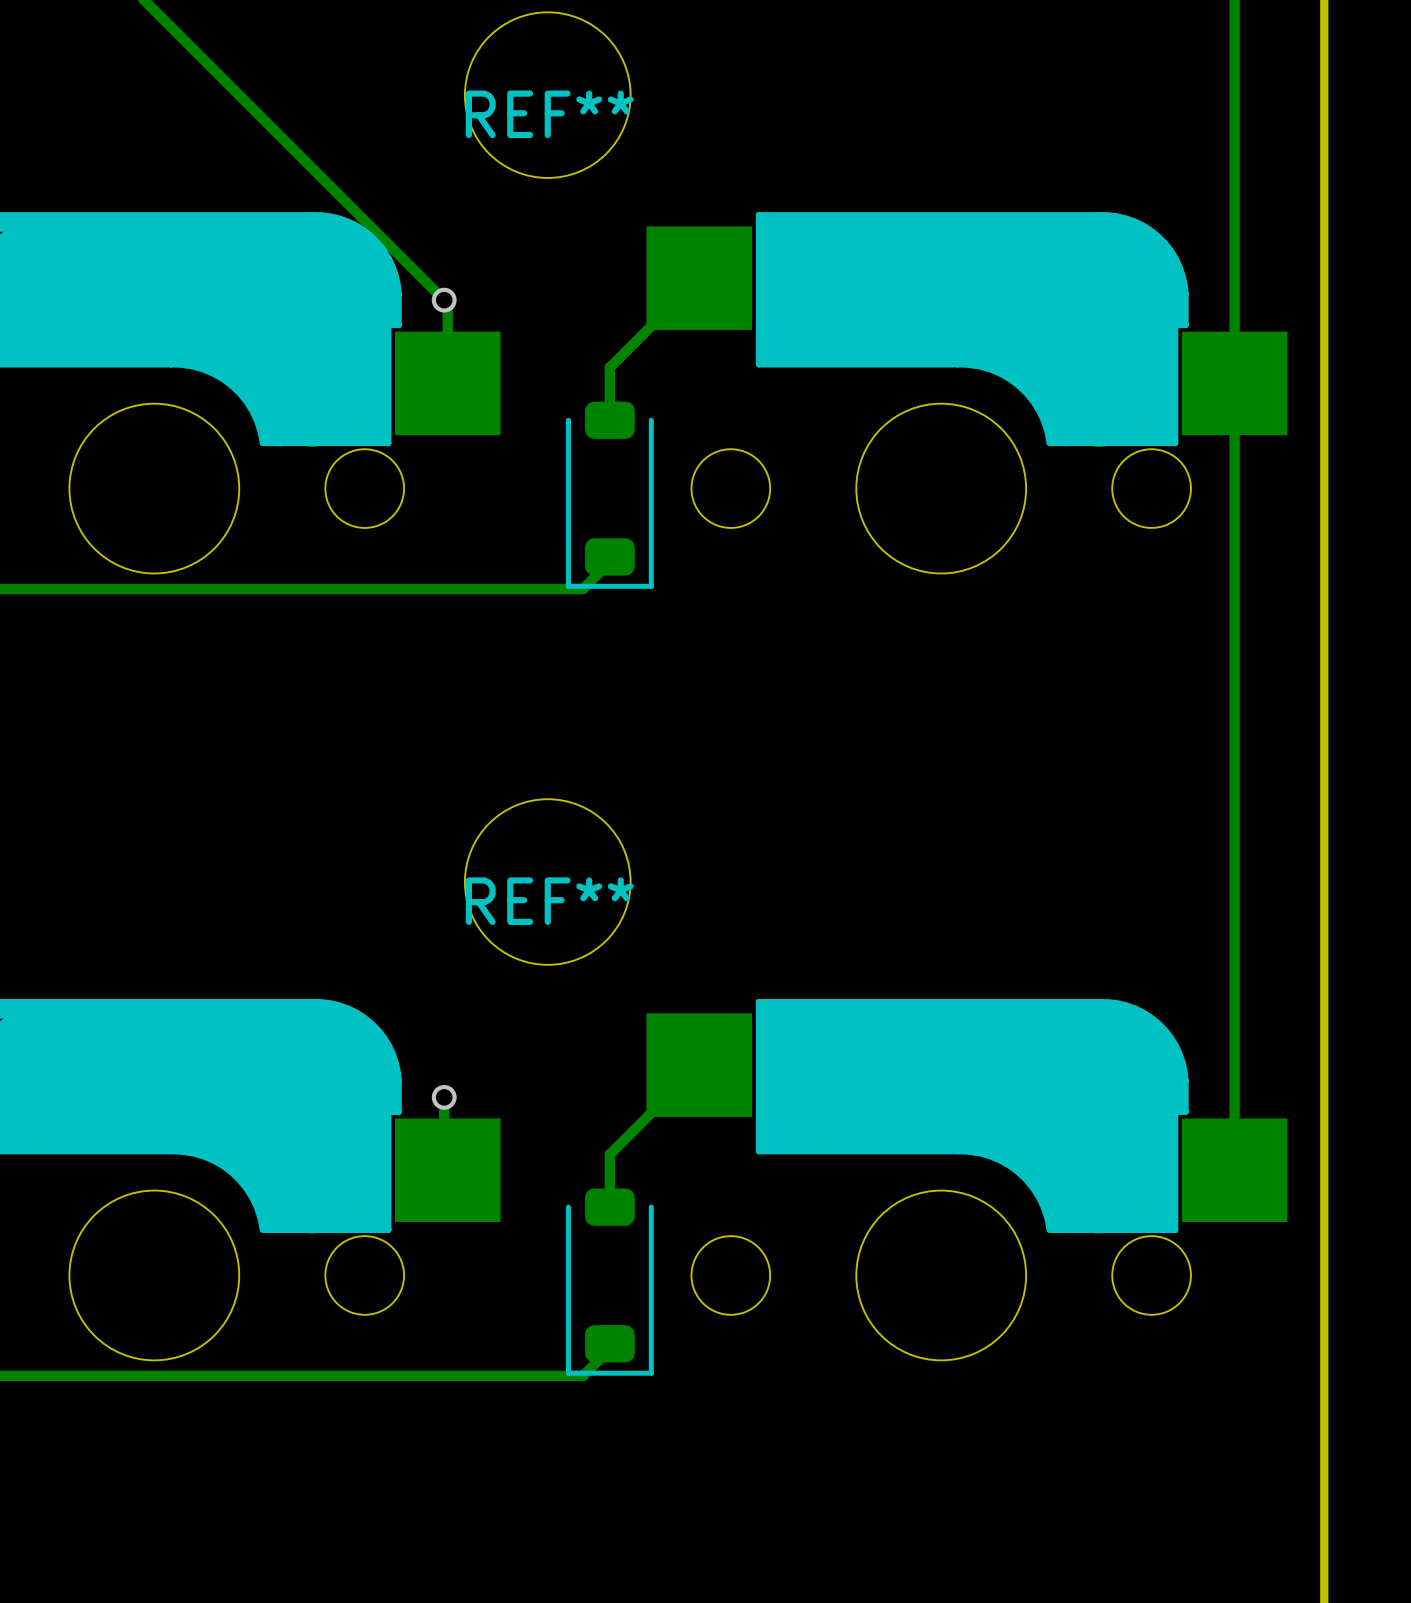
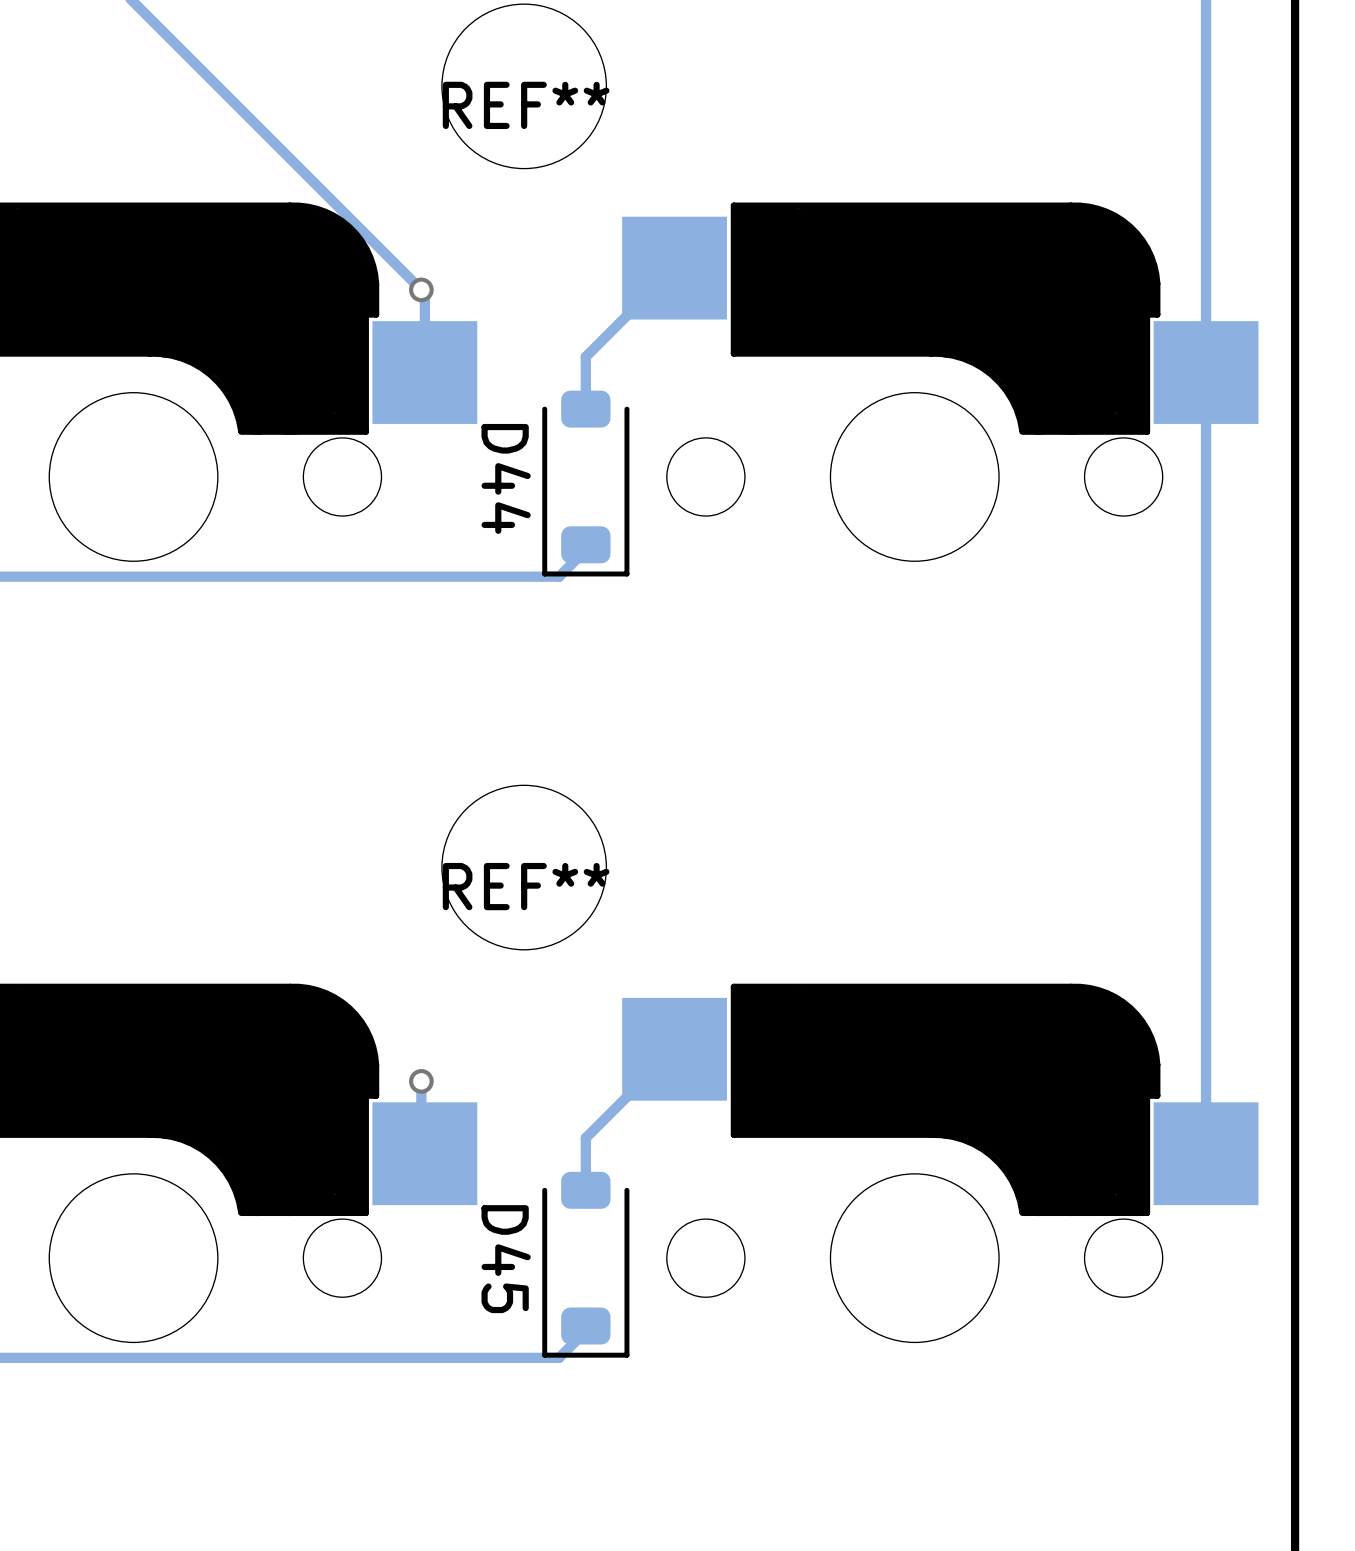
D44 name: none -> D44 (506, 478)
D45 name: none -> D45 (506, 1259)

